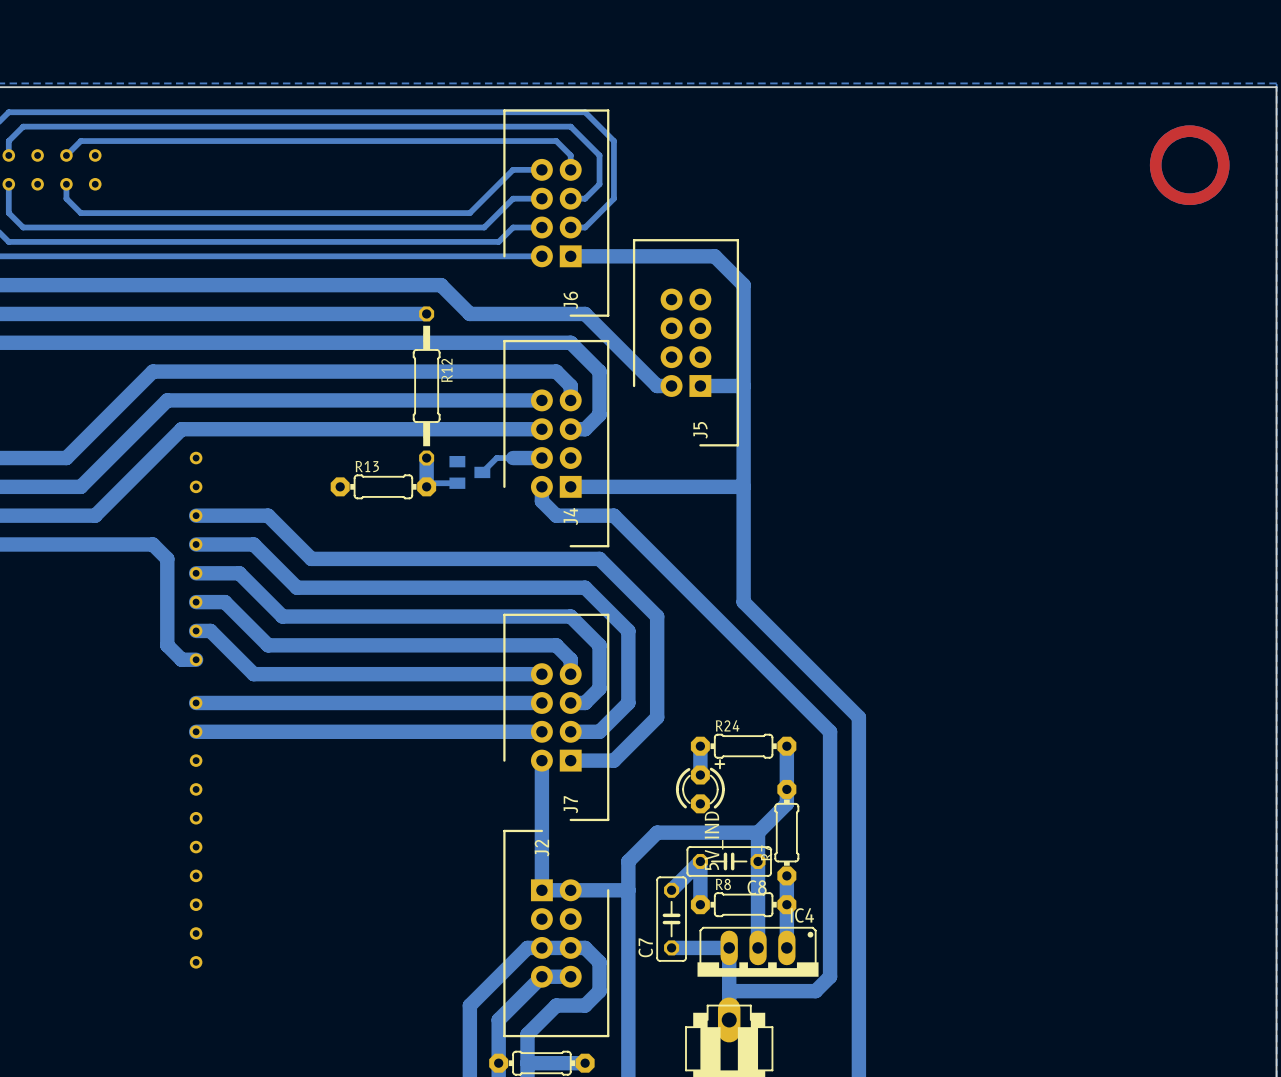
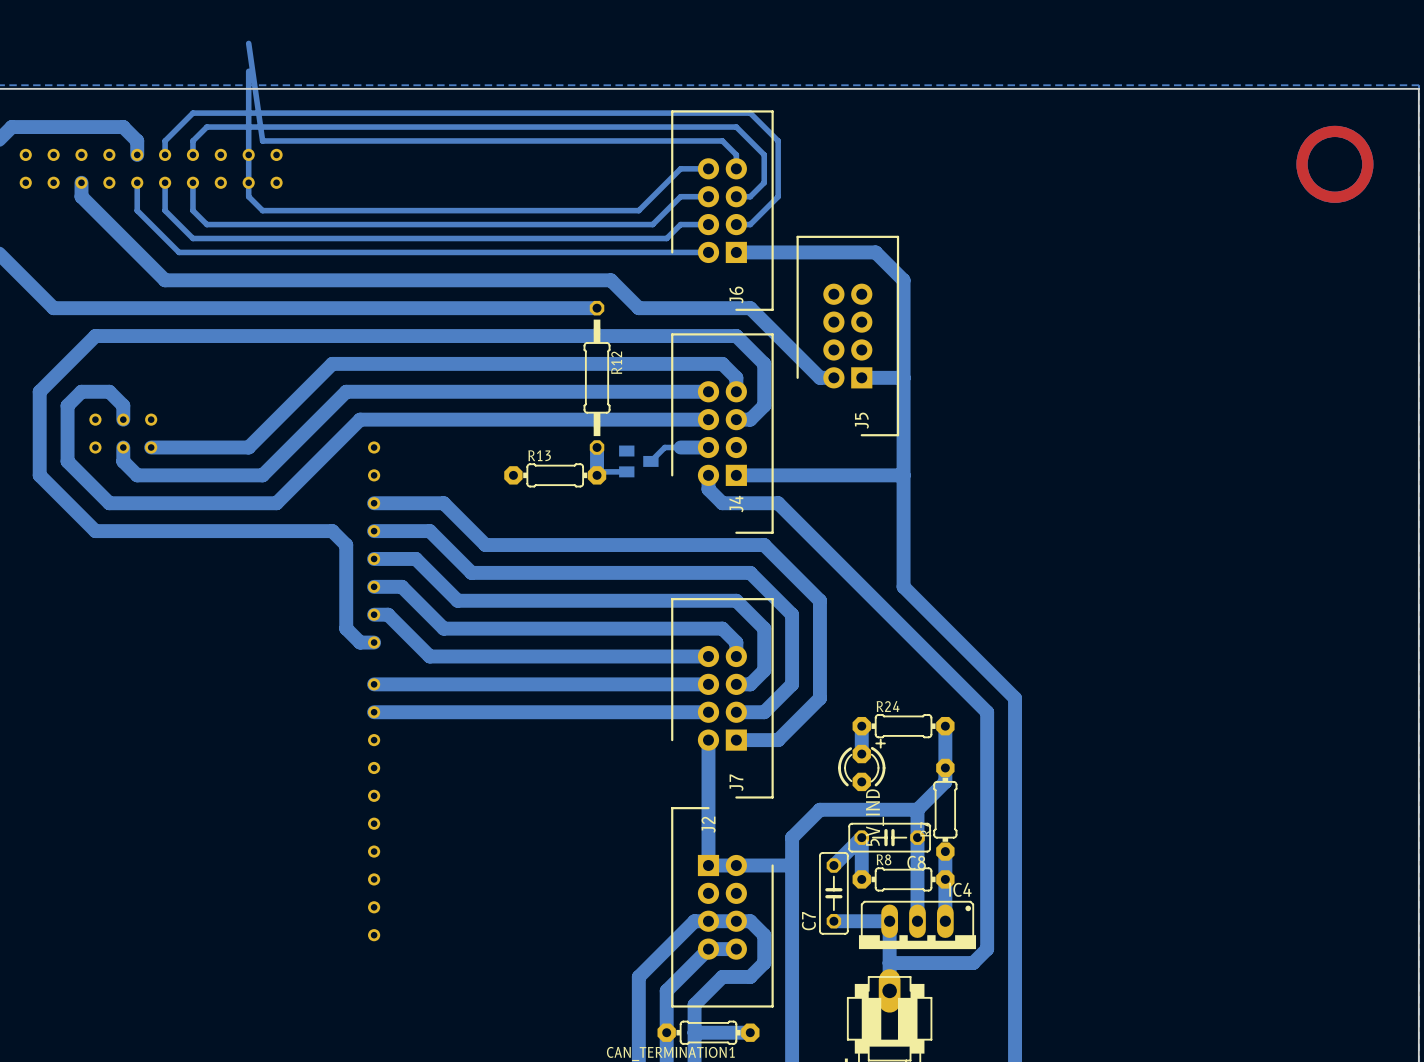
bottom track: none -> (248, 71) (248, 182)
bottom track: (80, 141) (66, 155) -> (262, 140) (248, 43)

